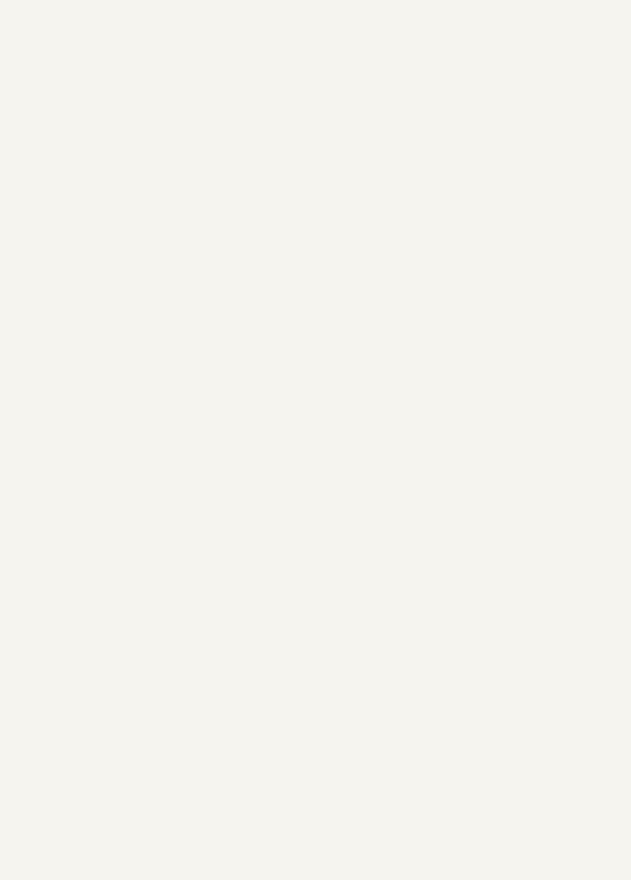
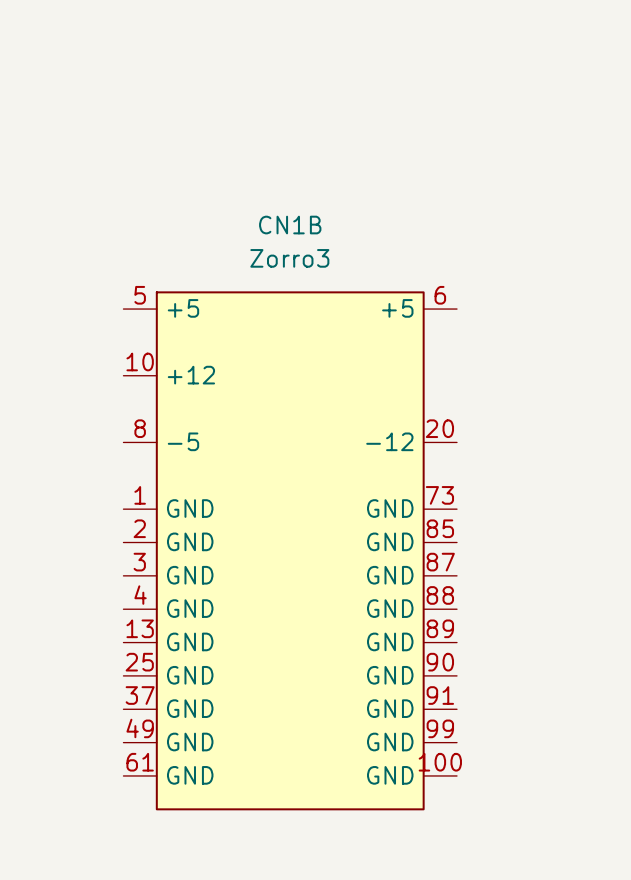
CN1B: none -> Zorro3 (290, 550)

